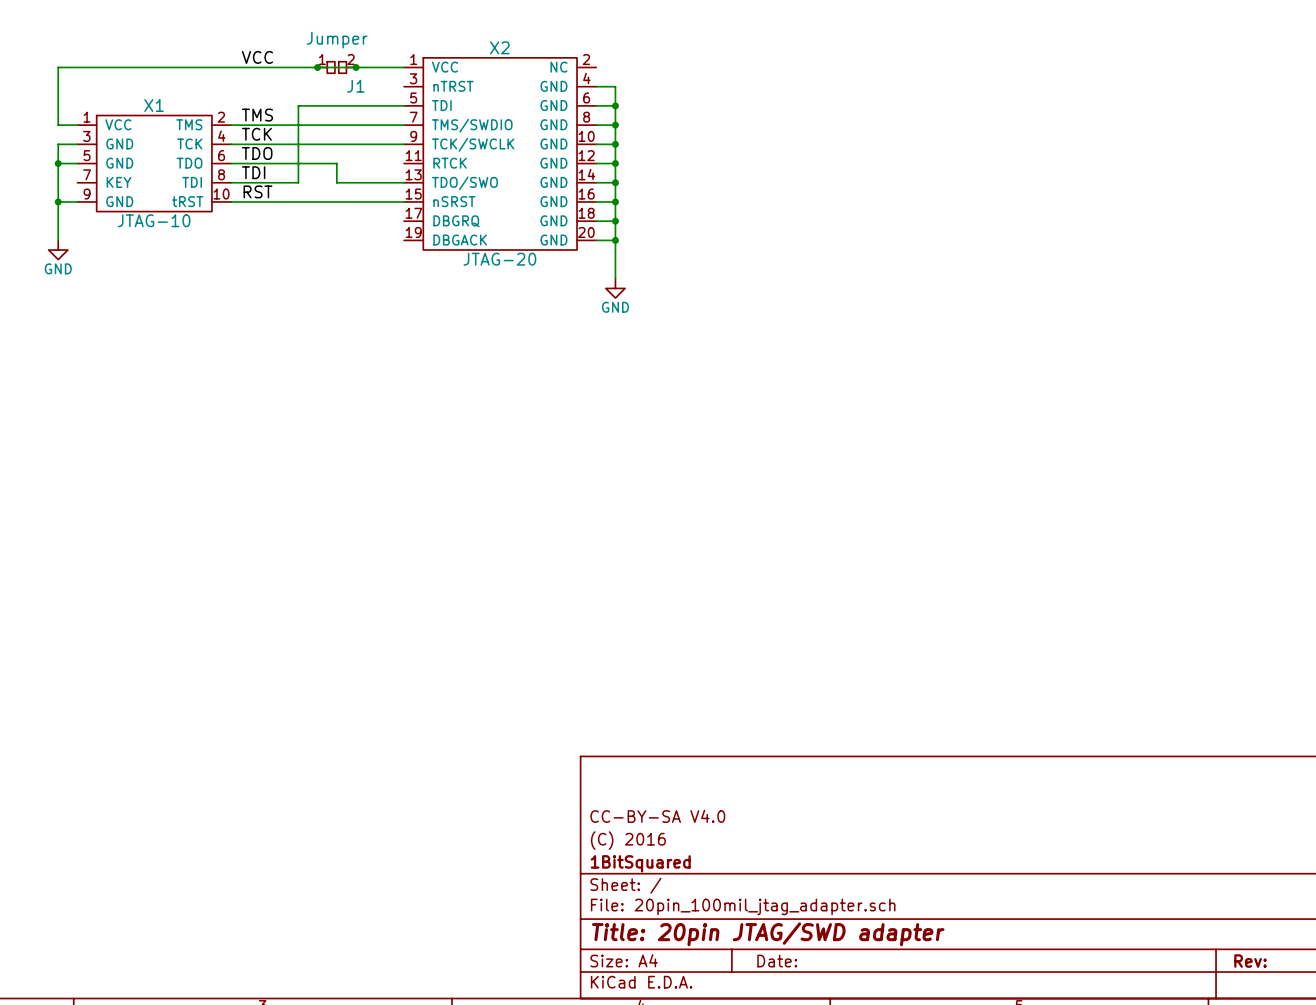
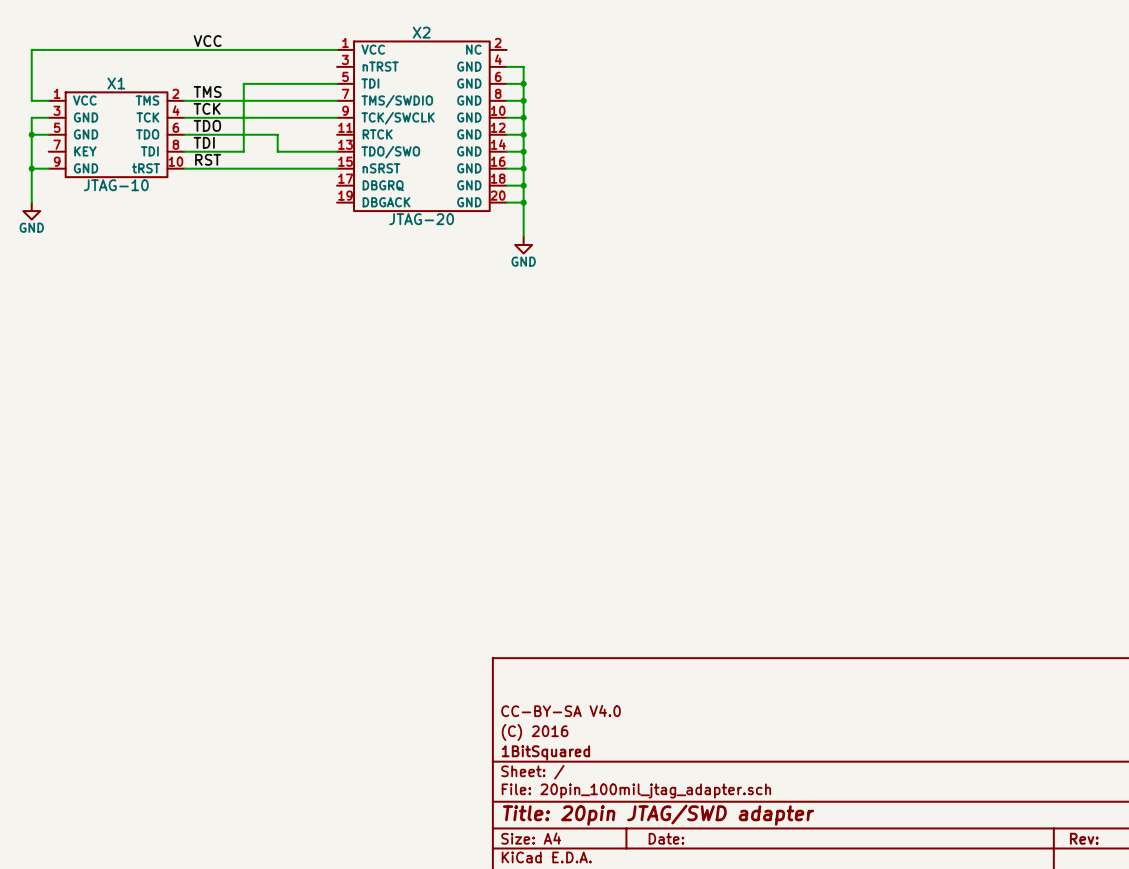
junction: (317, 67) -> none
J1: Jumper (336, 67) -> none
junction: (356, 67) -> none

